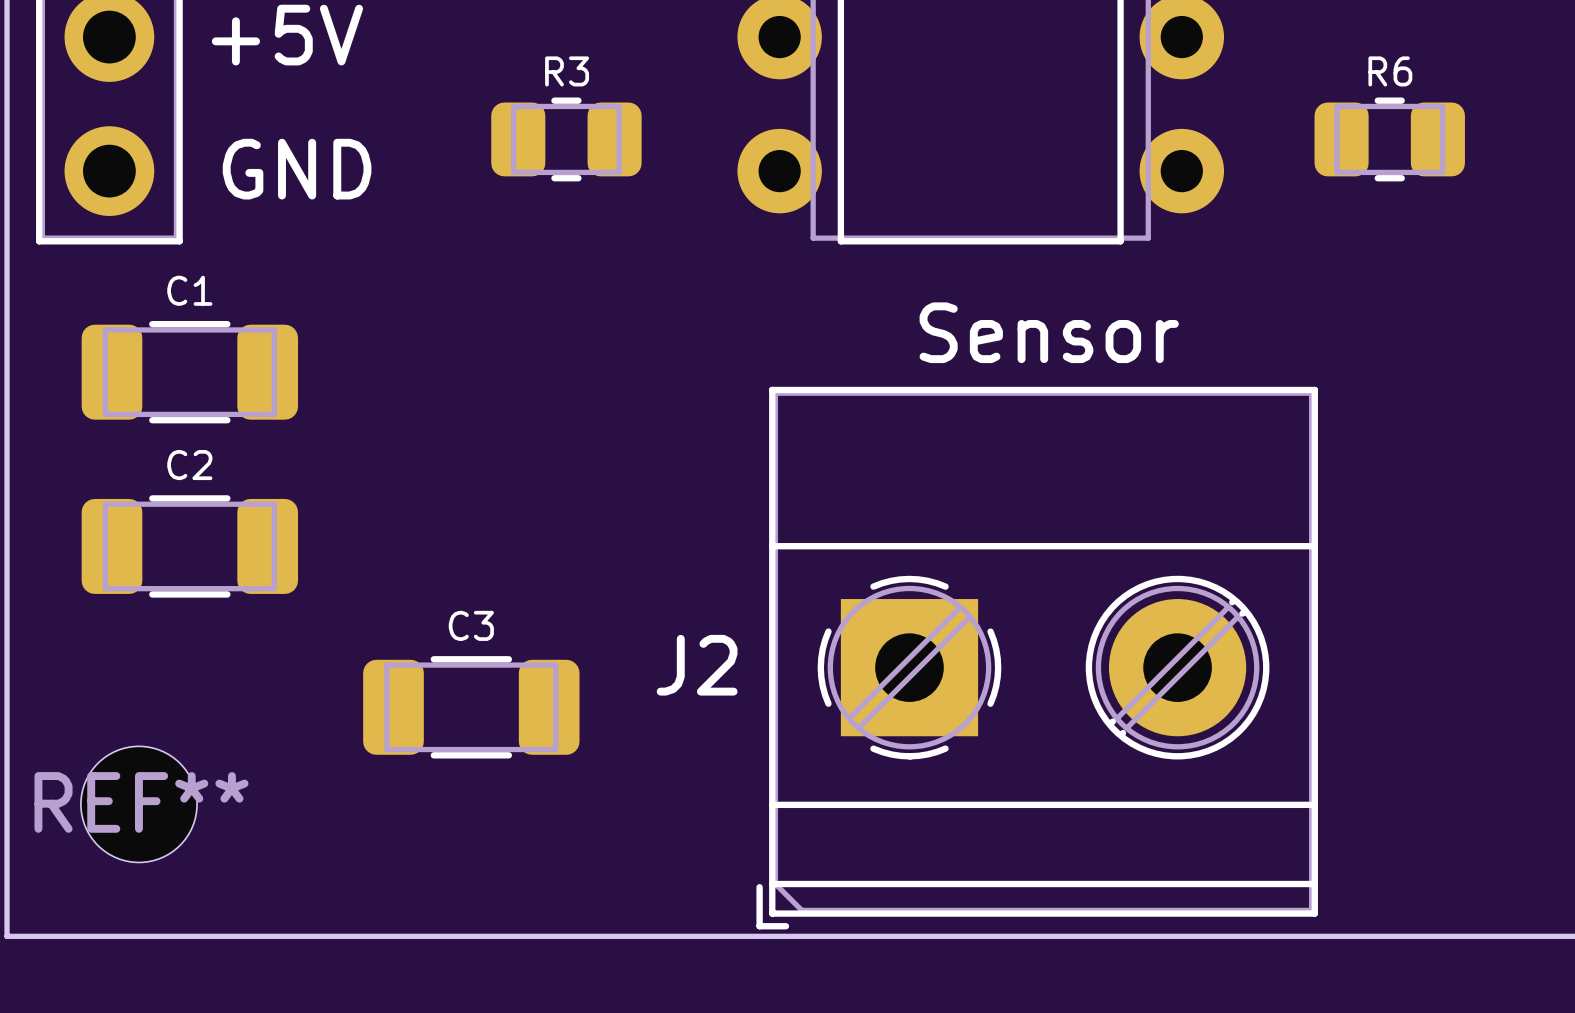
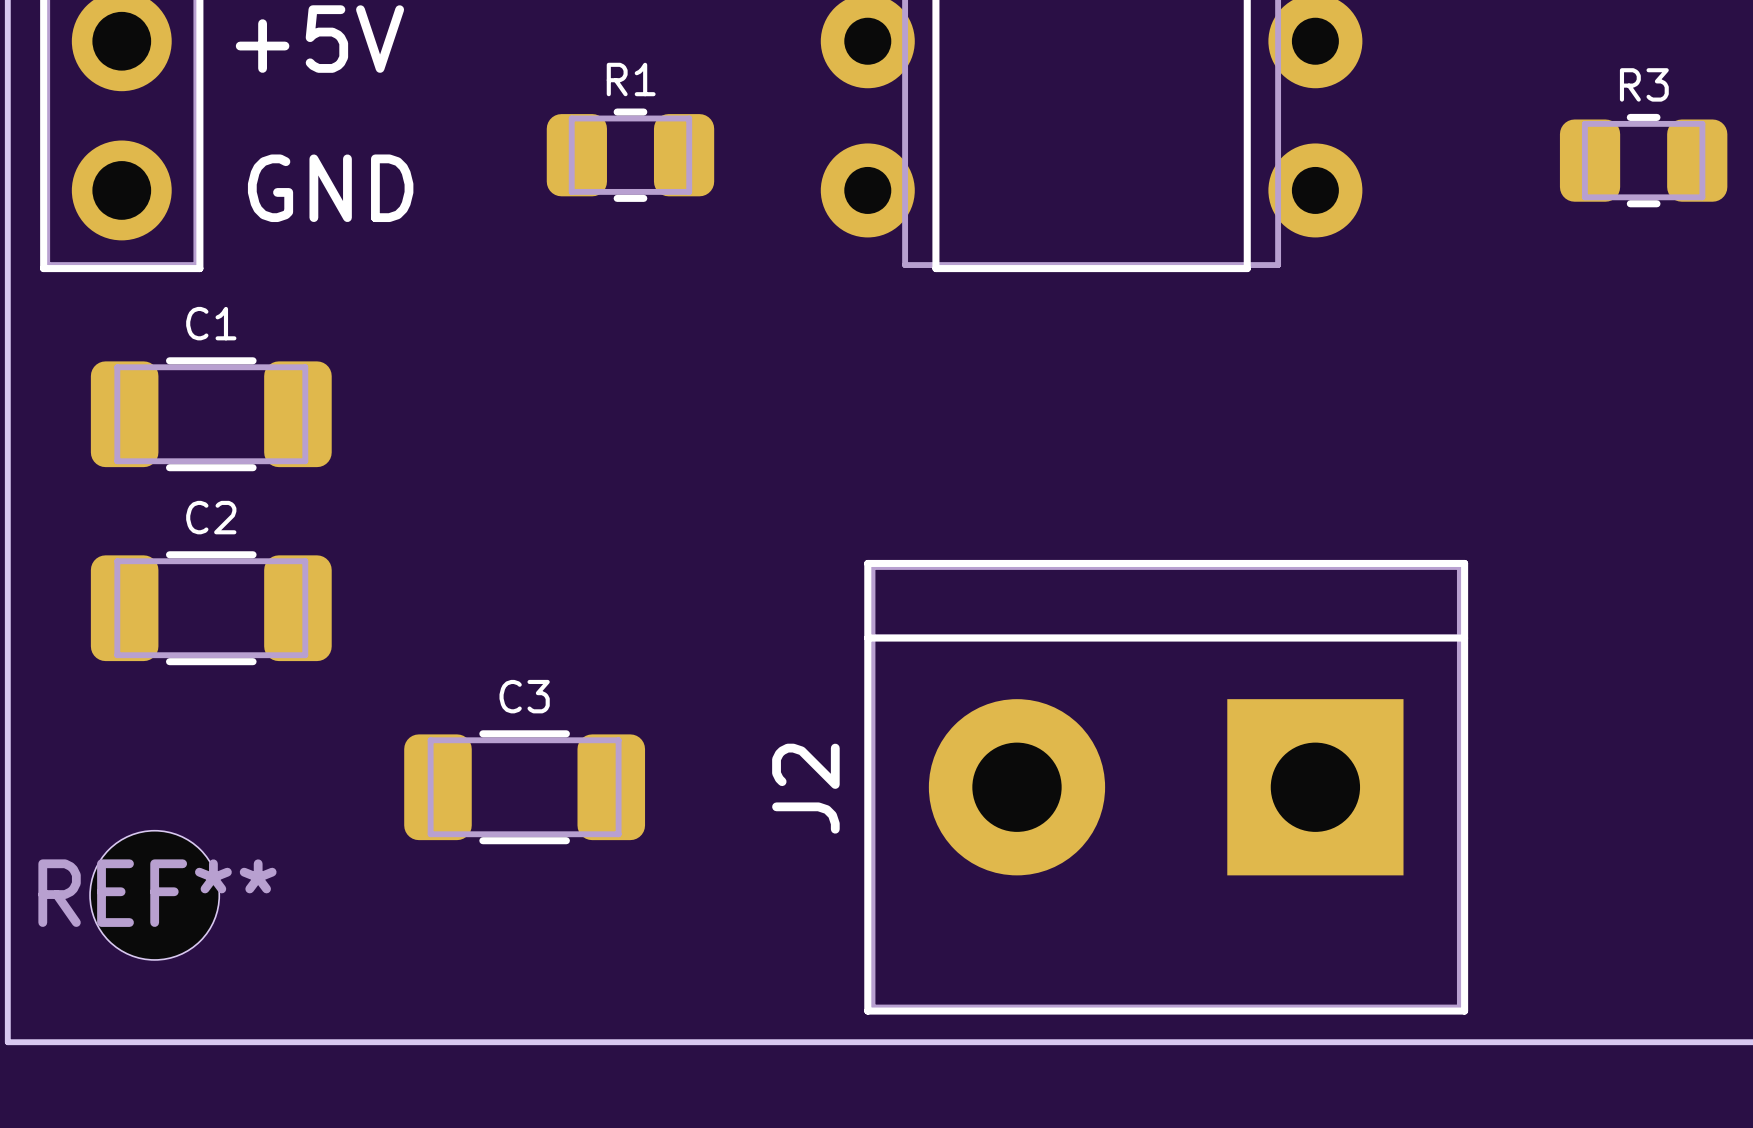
R3 name: R3 (567, 71) -> R1 (631, 79)
R6: (1389, 139) -> none
R3: none -> (1643, 160)
text: Sensor (1049, 332) -> none
J2 footprint: [756, 386, 1318, 930] -> [864, 559, 1469, 1015]

